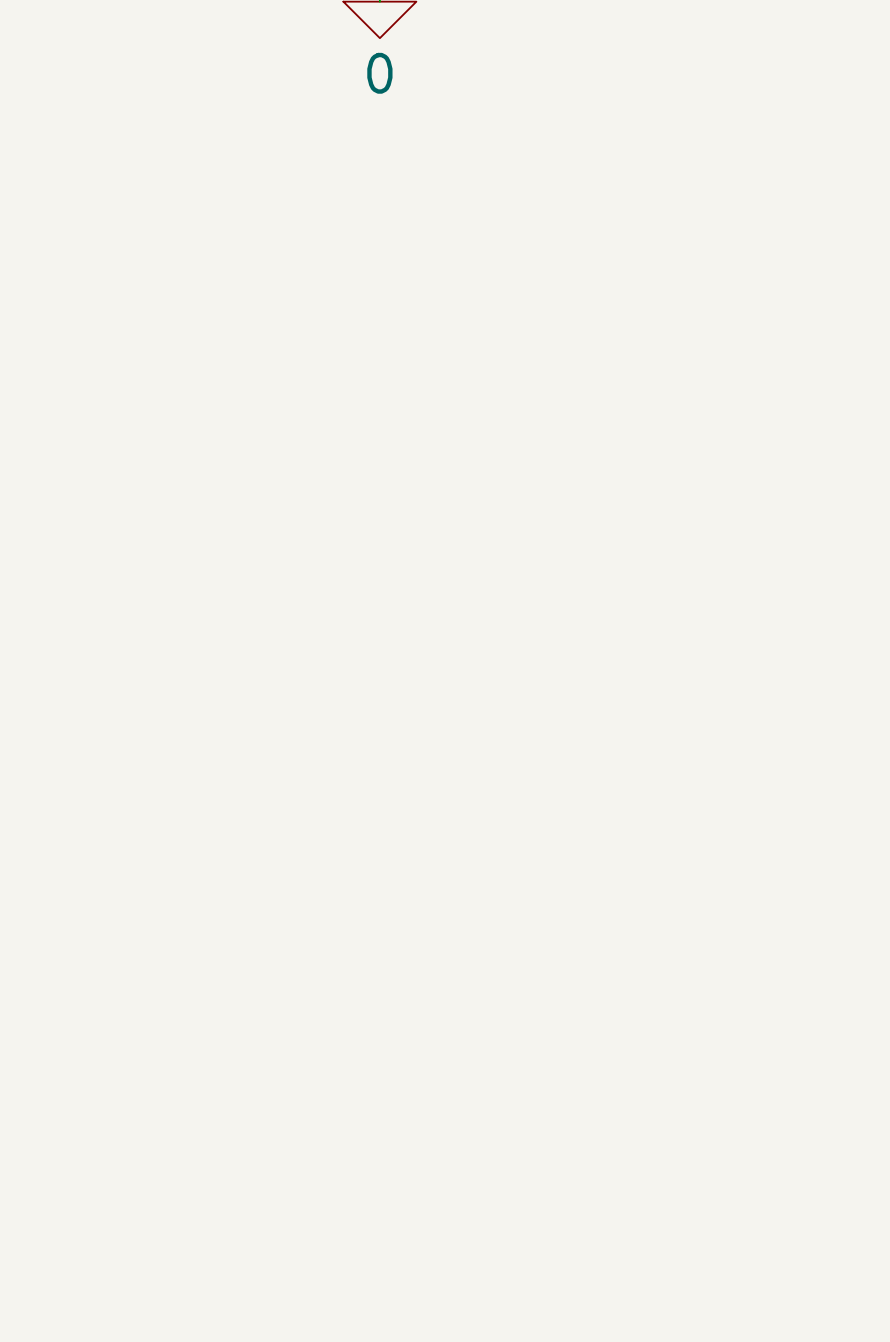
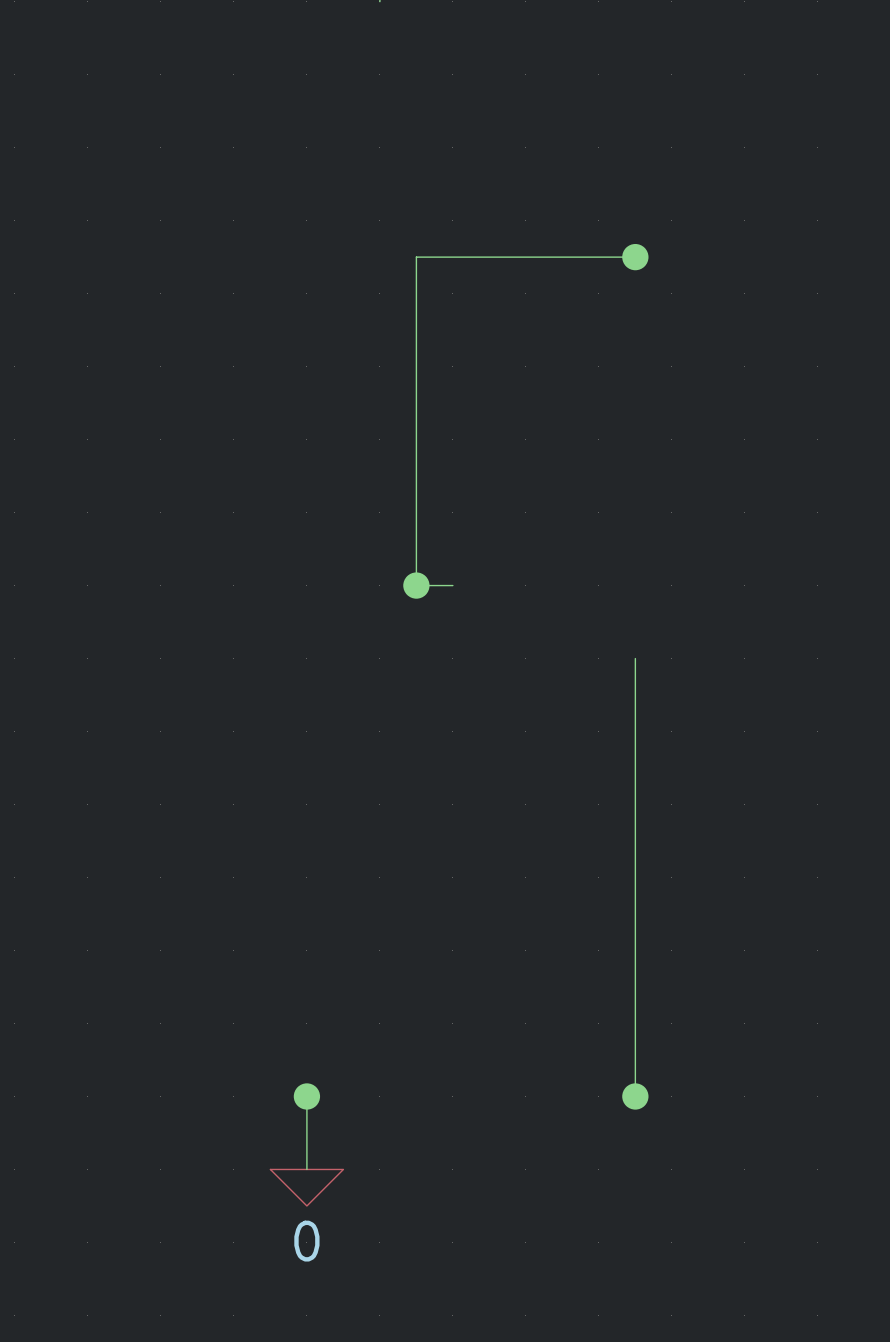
power symbol: 0 (379, 19) -> none
wire: none -> (635, 257) (416, 257) (416, 585) (452, 585)
junction: none -> (635, 257)
junction: none -> (416, 585)
wire: none -> (635, 658) (635, 1096)
wire: none -> (306, 1096) (306, 1169)
junction: none -> (306, 1096)
junction: none -> (635, 1096)
power symbol: none -> 0 (306, 1187)

